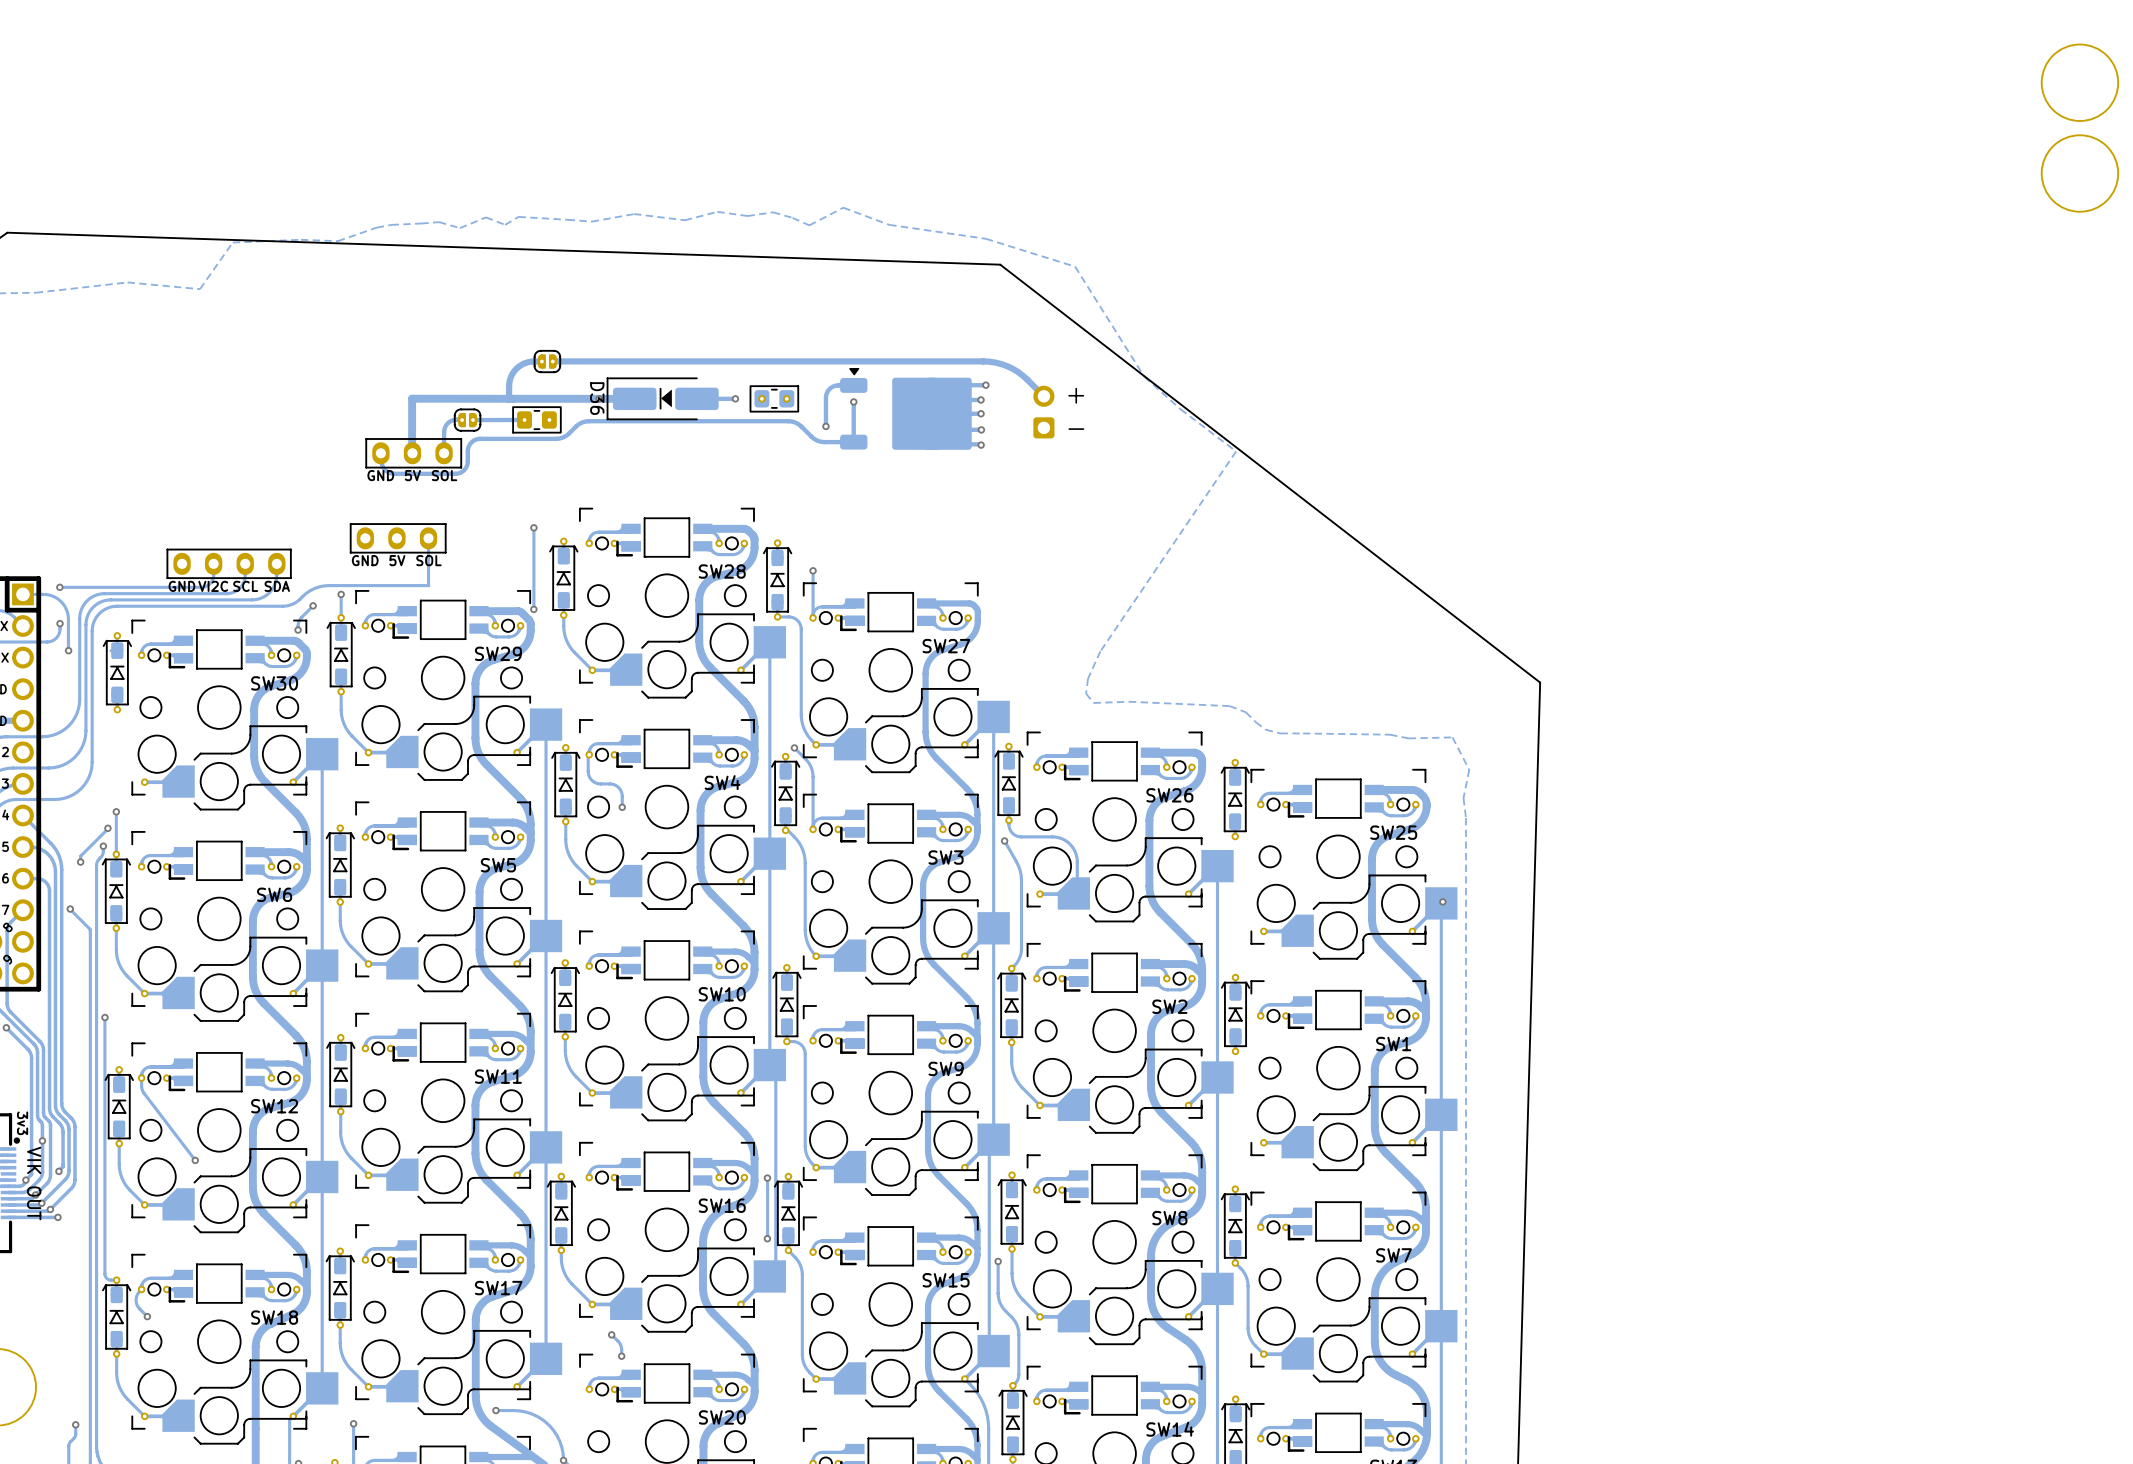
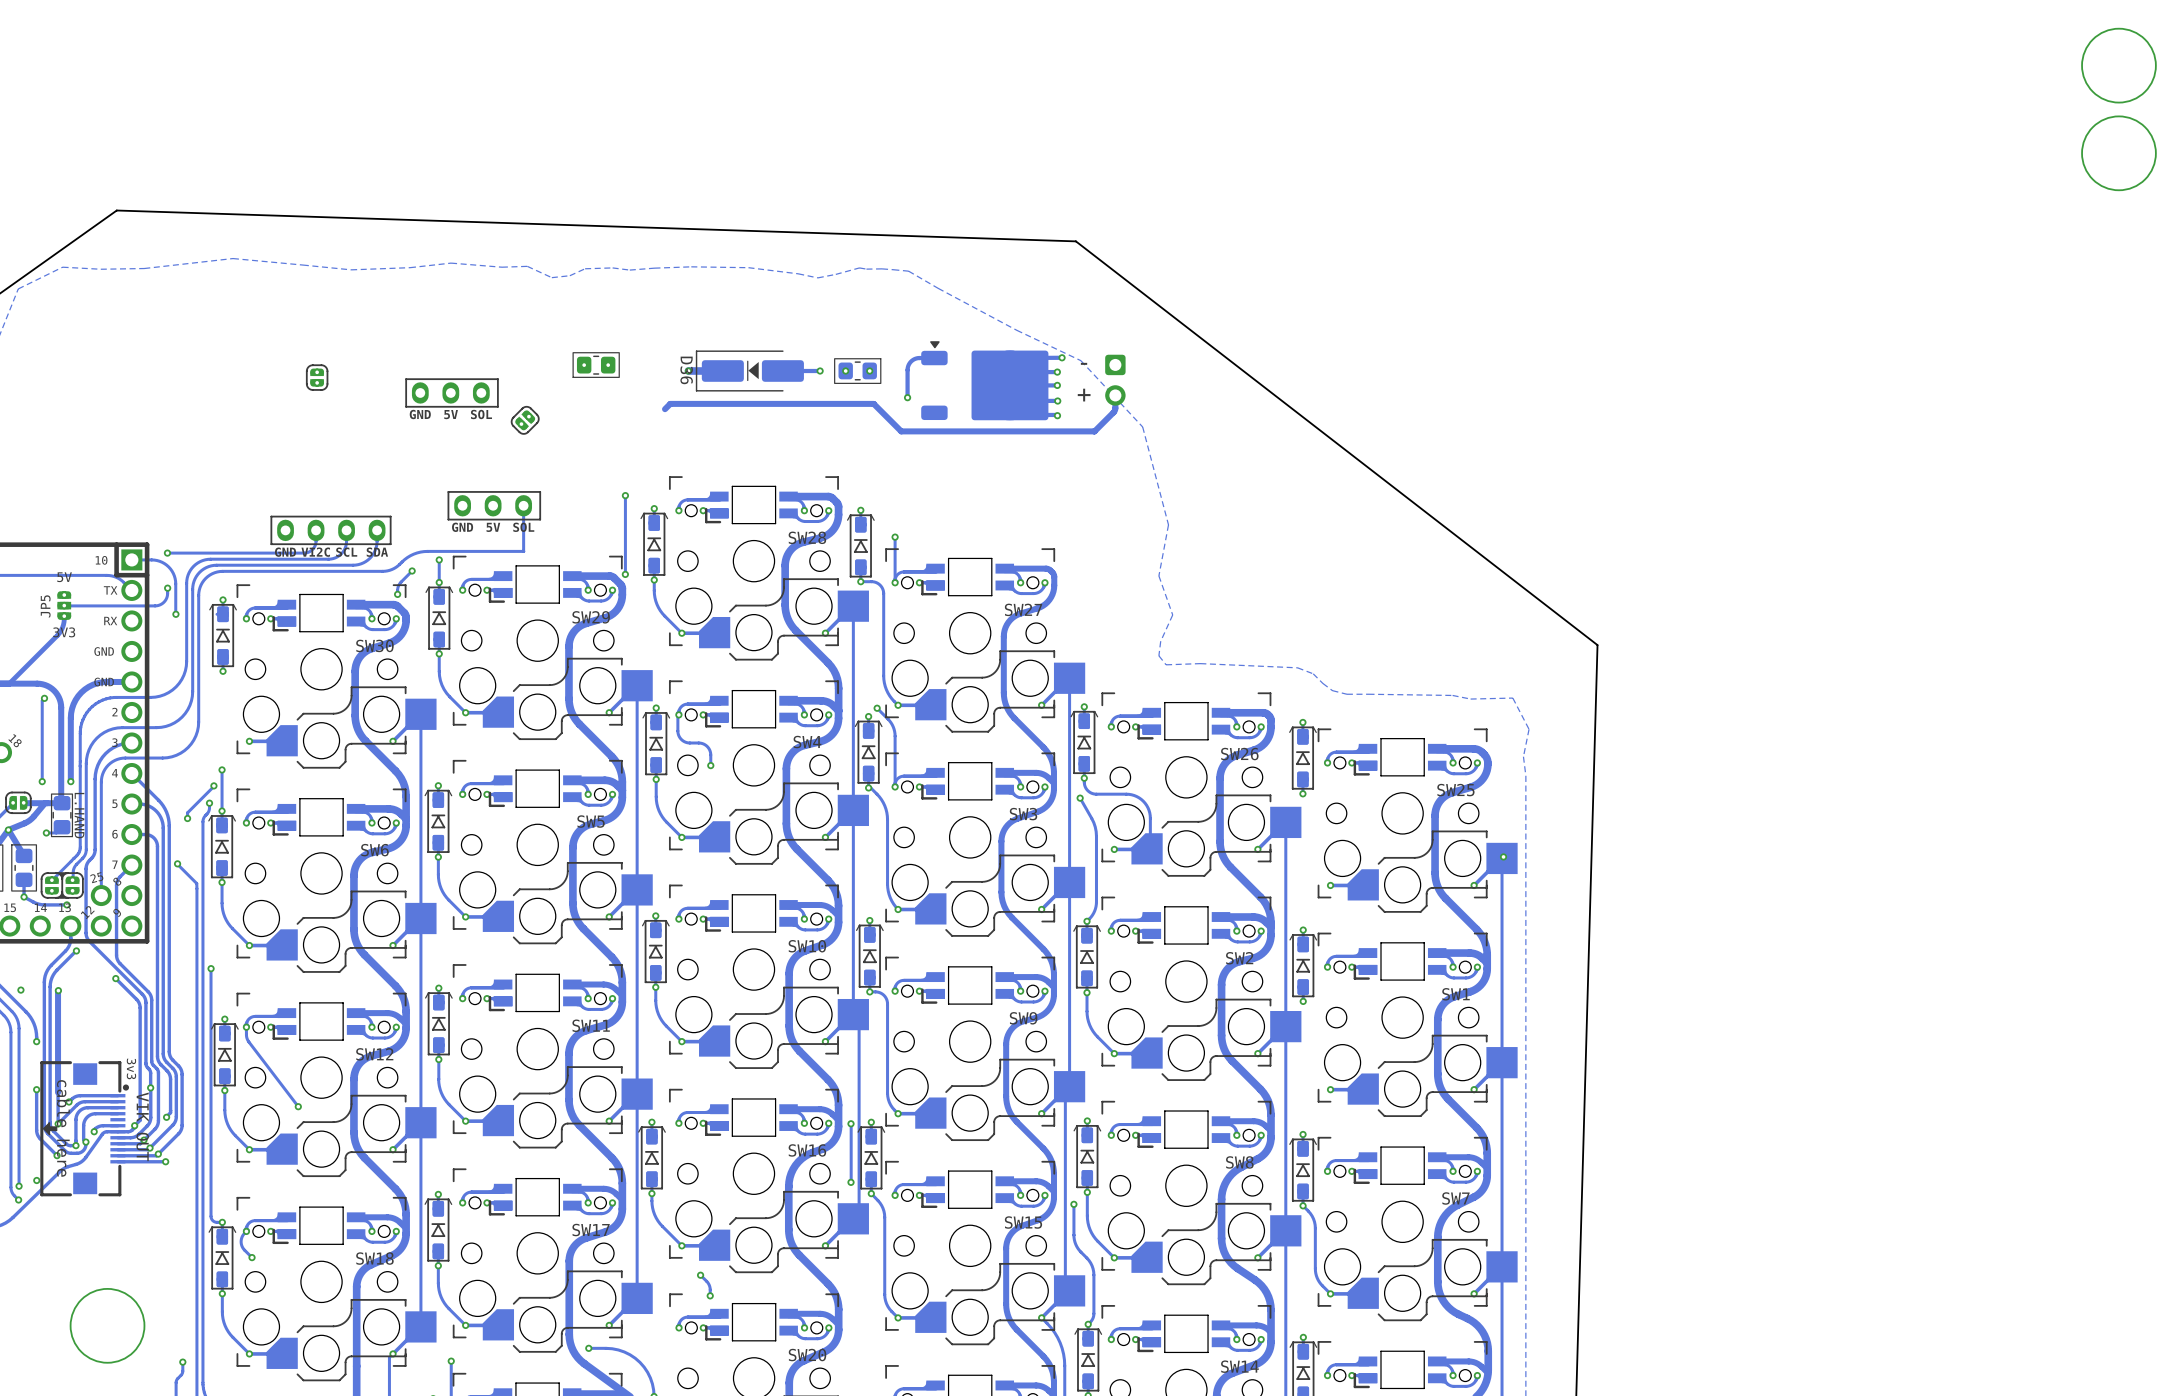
zone outline: (199, 289) (232, 242) (301, 239) (337, 241) (376, 227) (391, 224) (439, 222) (459, 228) (485, 217) (505, 224) (518, 216) (591, 221) (634, 214) (684, 220) (717, 211) (747, 216) (773, 212) (809, 225) (843, 207) (889, 224) (985, 238) (1075, 266) (1144, 376) (1180, 409) (1236, 451) (1100, 651) -> (302, 265) (351, 269) (409, 267) (451, 263) (501, 267) (527, 266) (551, 277) (569, 275) (585, 268) (612, 267) (629, 270) (691, 266) (748, 267) (817, 277) (859, 267) (908, 271) (1016, 330) (1080, 360) (1142, 426) (1168, 524) (1158, 575) (1172, 614)
track: (541, 361) (525, 362) (514, 370) (509, 380) (509, 398) -> none
part: (547, 361) -> none
track: (552, 361) (989, 361) (1001, 364) (1017, 371) (1043, 396) -> none
track: (599, 398) (412, 398) (412, 453) -> none
track: (853, 401) (853, 442) (819, 441) (813, 438) (799, 425) (790, 421) (589, 421) (579, 423) (567, 435) (558, 438) (476, 439) (468, 447) (465, 467) (456, 473) (391, 473) (382, 466) (380, 453) -> none
via: (853, 401) -> none
part: none -> (317, 377)
part rotation: 0° (1043, 412) -> 180° (1115, 380)
track: (524, 419) (473, 420) -> none
part position: (536, 419) -> (596, 365)
track: (462, 420) (451, 420) (445, 425) (444, 453) -> none
part: (467, 420) -> none
track: none -> (1115, 395) (1114, 411) (1094, 431) (901, 431) (873, 403) (670, 403) (665, 409)
part: none -> (525, 420)
part position: (413, 453) -> (452, 392)

